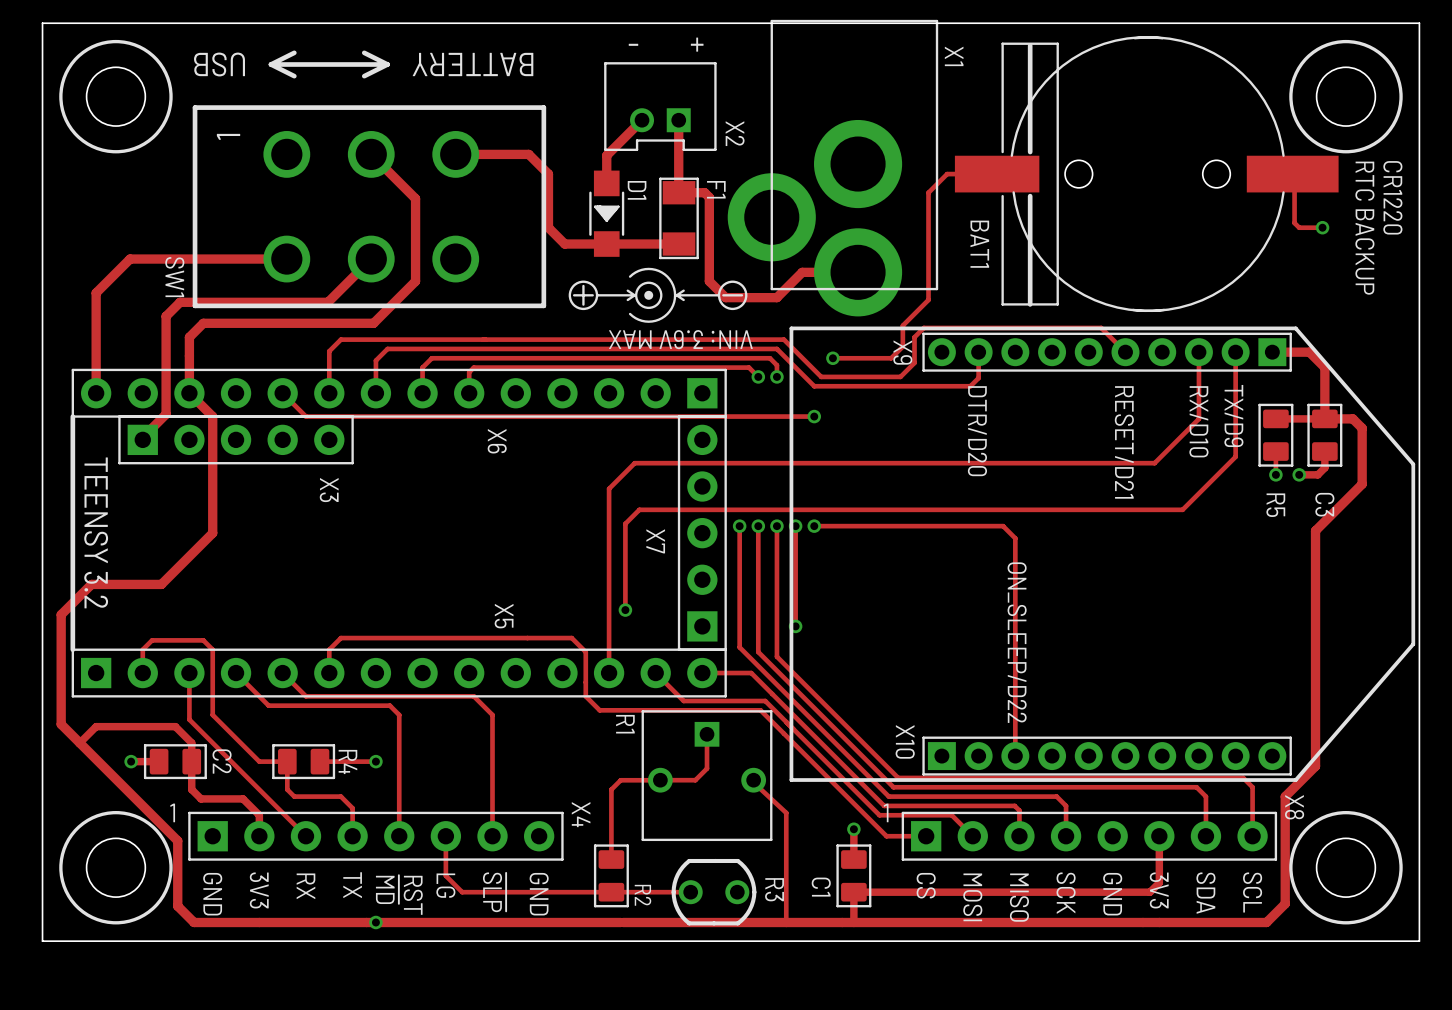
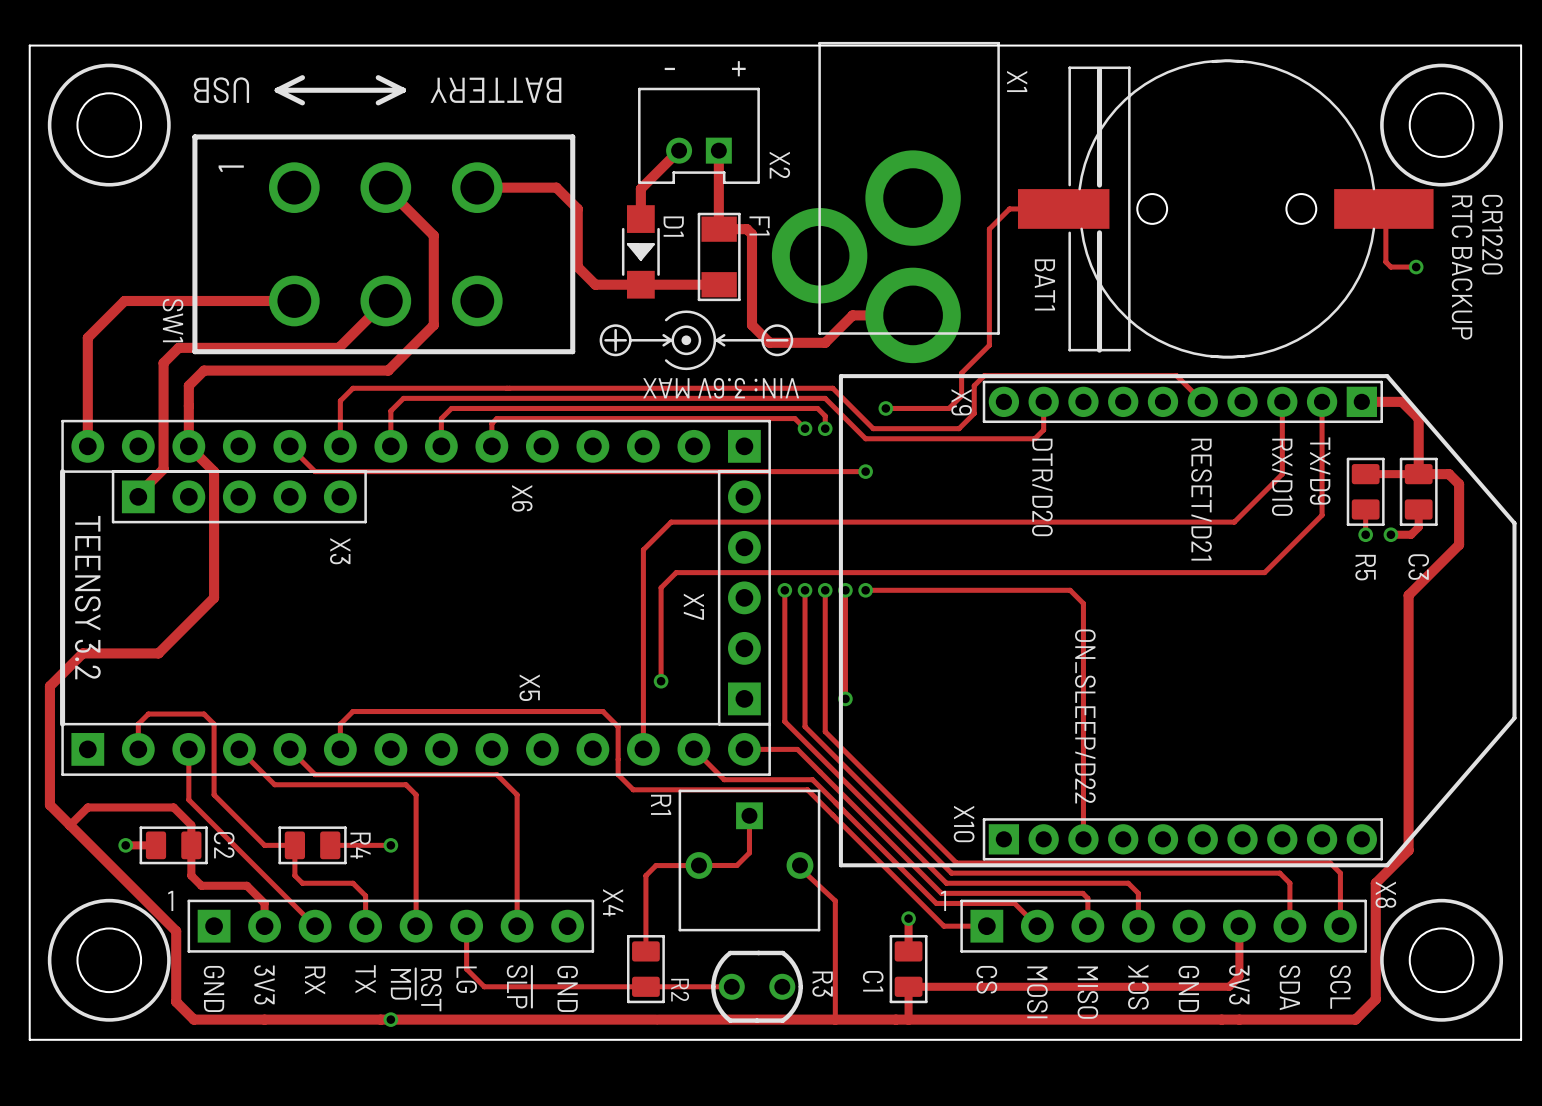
text rotation: 0° (1066, 893) -> 180° (1138, 987)

